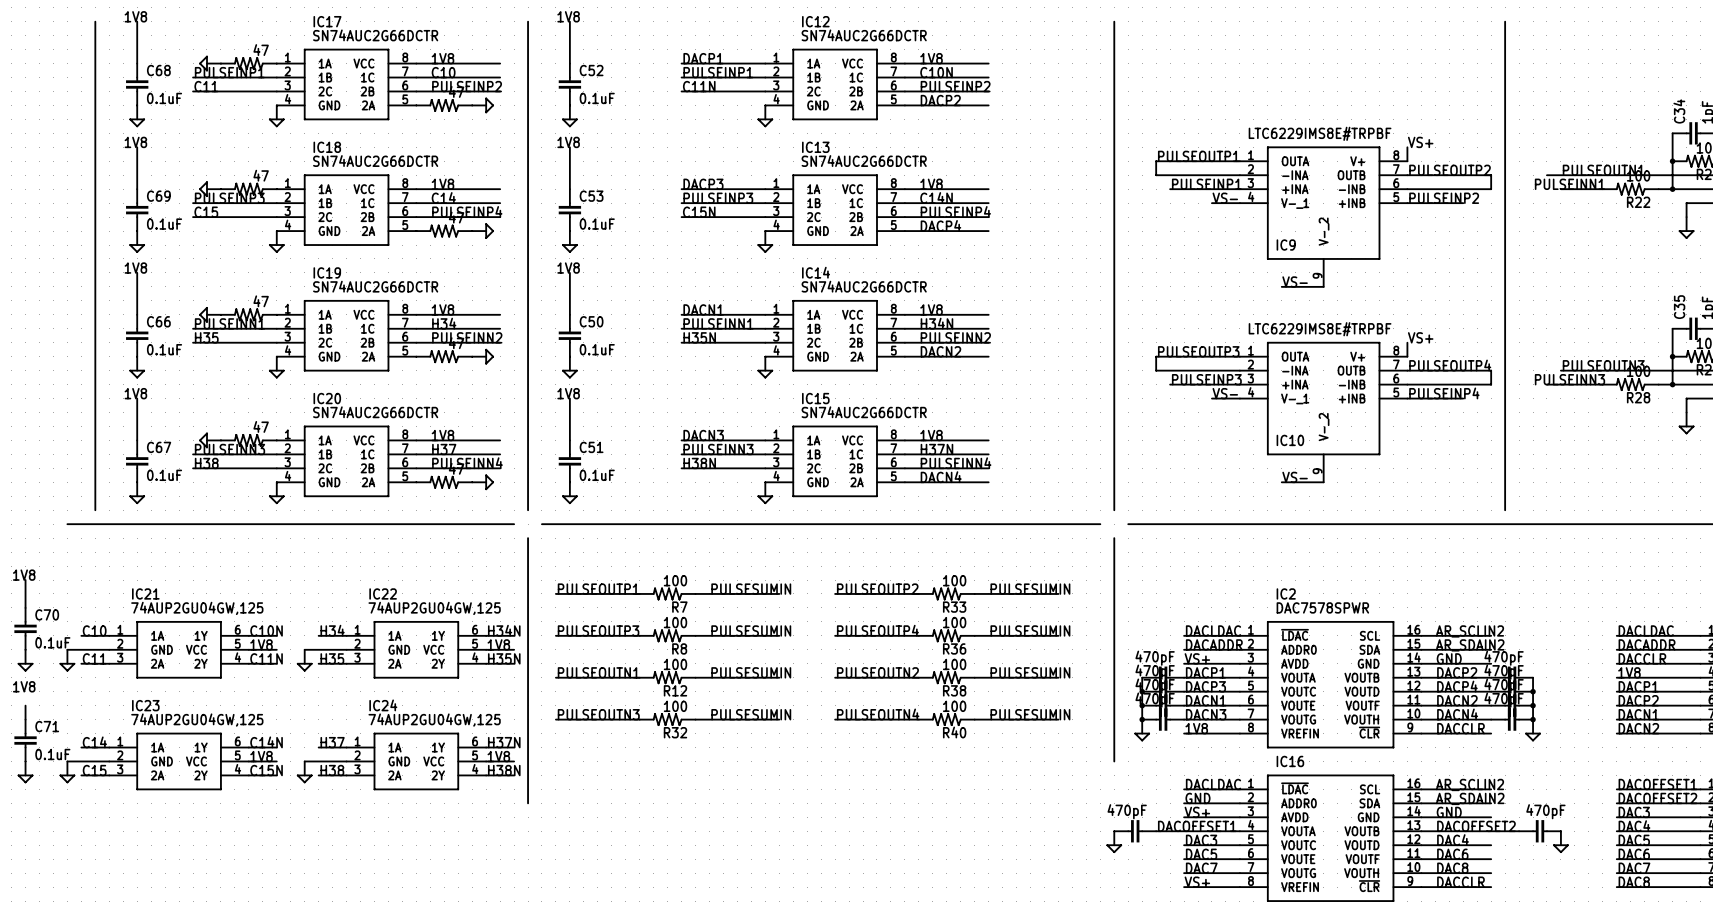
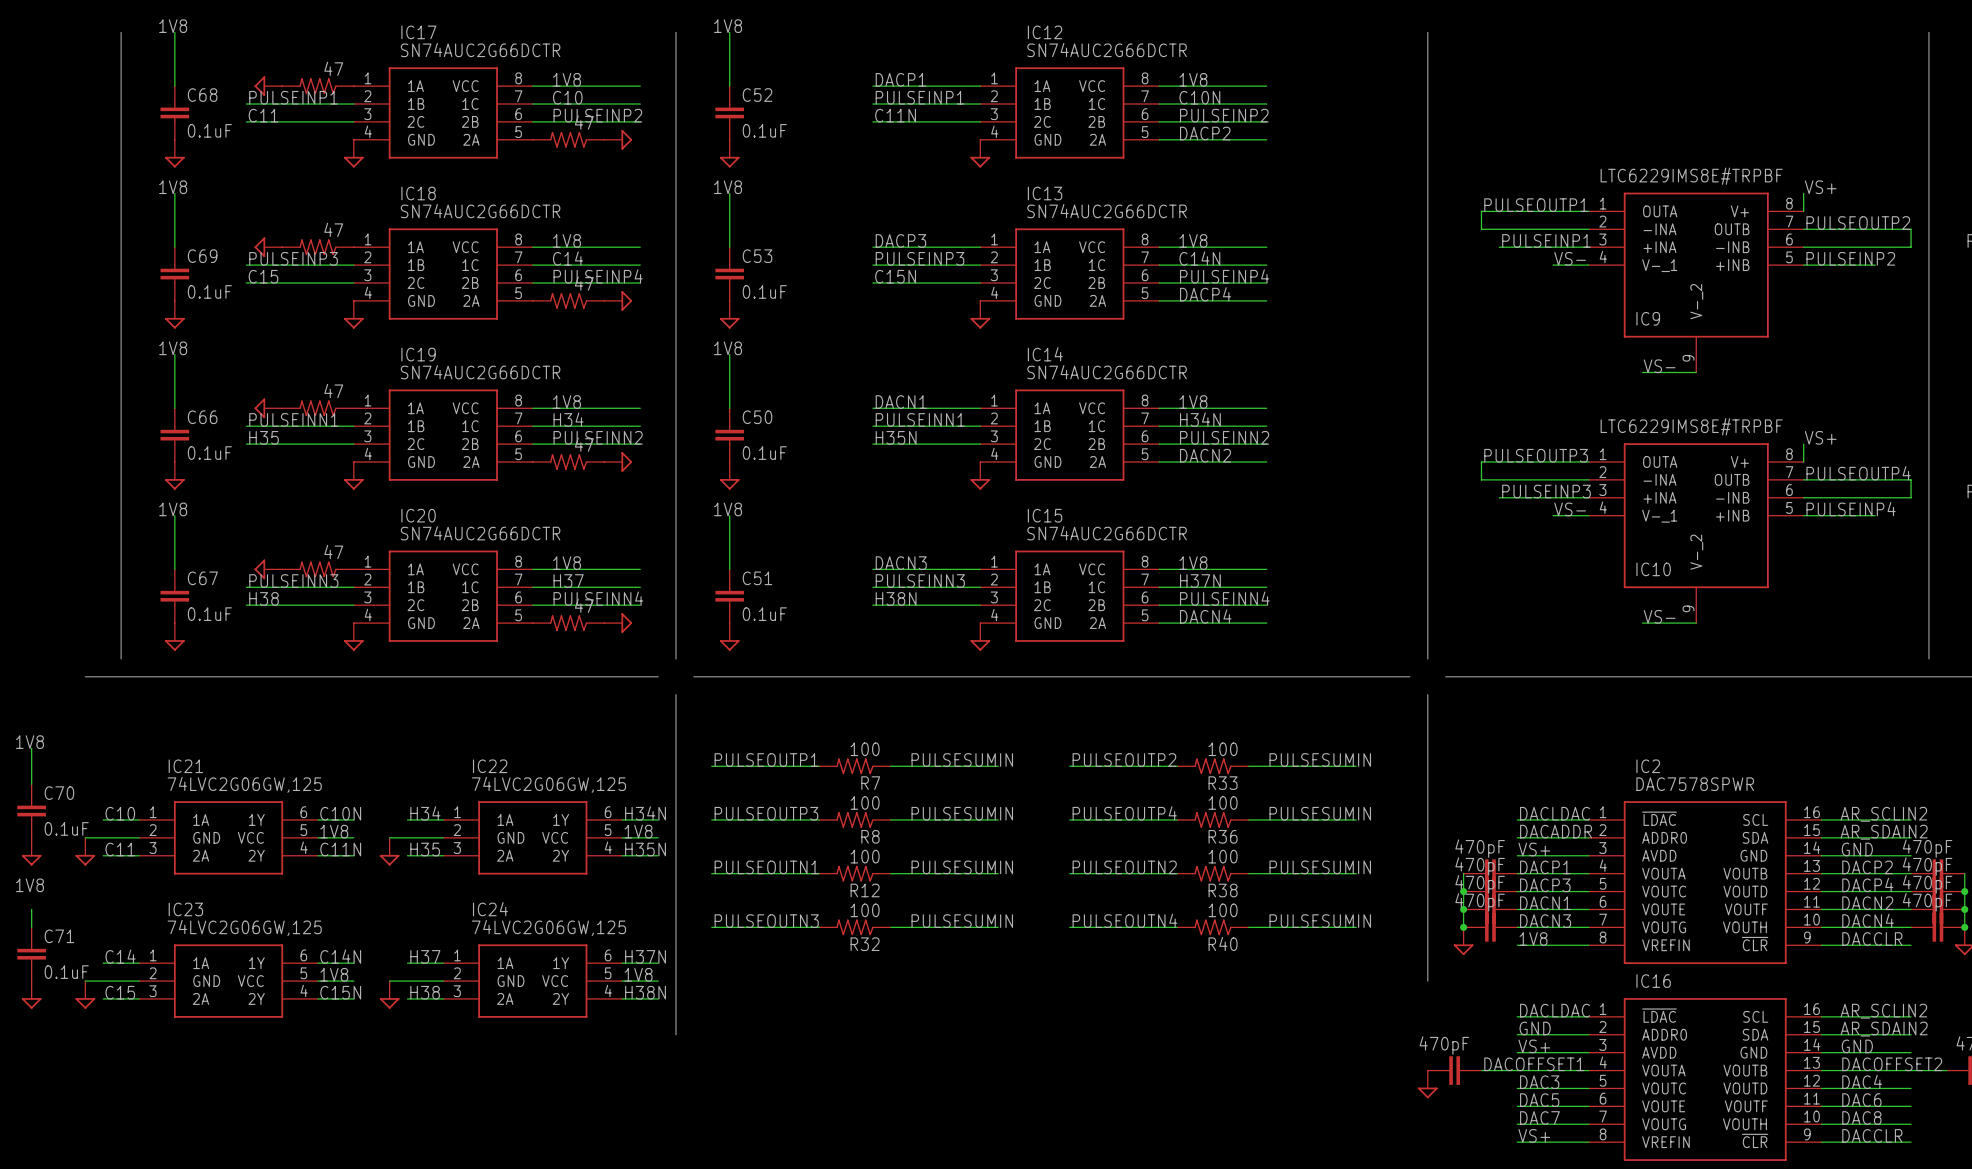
IC21 value: 74AUP2GU04GW,125 (197, 608) -> 74LVC2G06GW,125 (244, 784)
IC22 value: 74AUP2GU04GW,125 (434, 608) -> 74LVC2G06GW,125 (548, 784)
IC23 value: 74AUP2GU04GW,125 (197, 720) -> 74LVC2G06GW,125 (244, 927)
IC24 value: 74AUP2GU04GW,125 (434, 720) -> 74LVC2G06GW,125 (548, 927)

